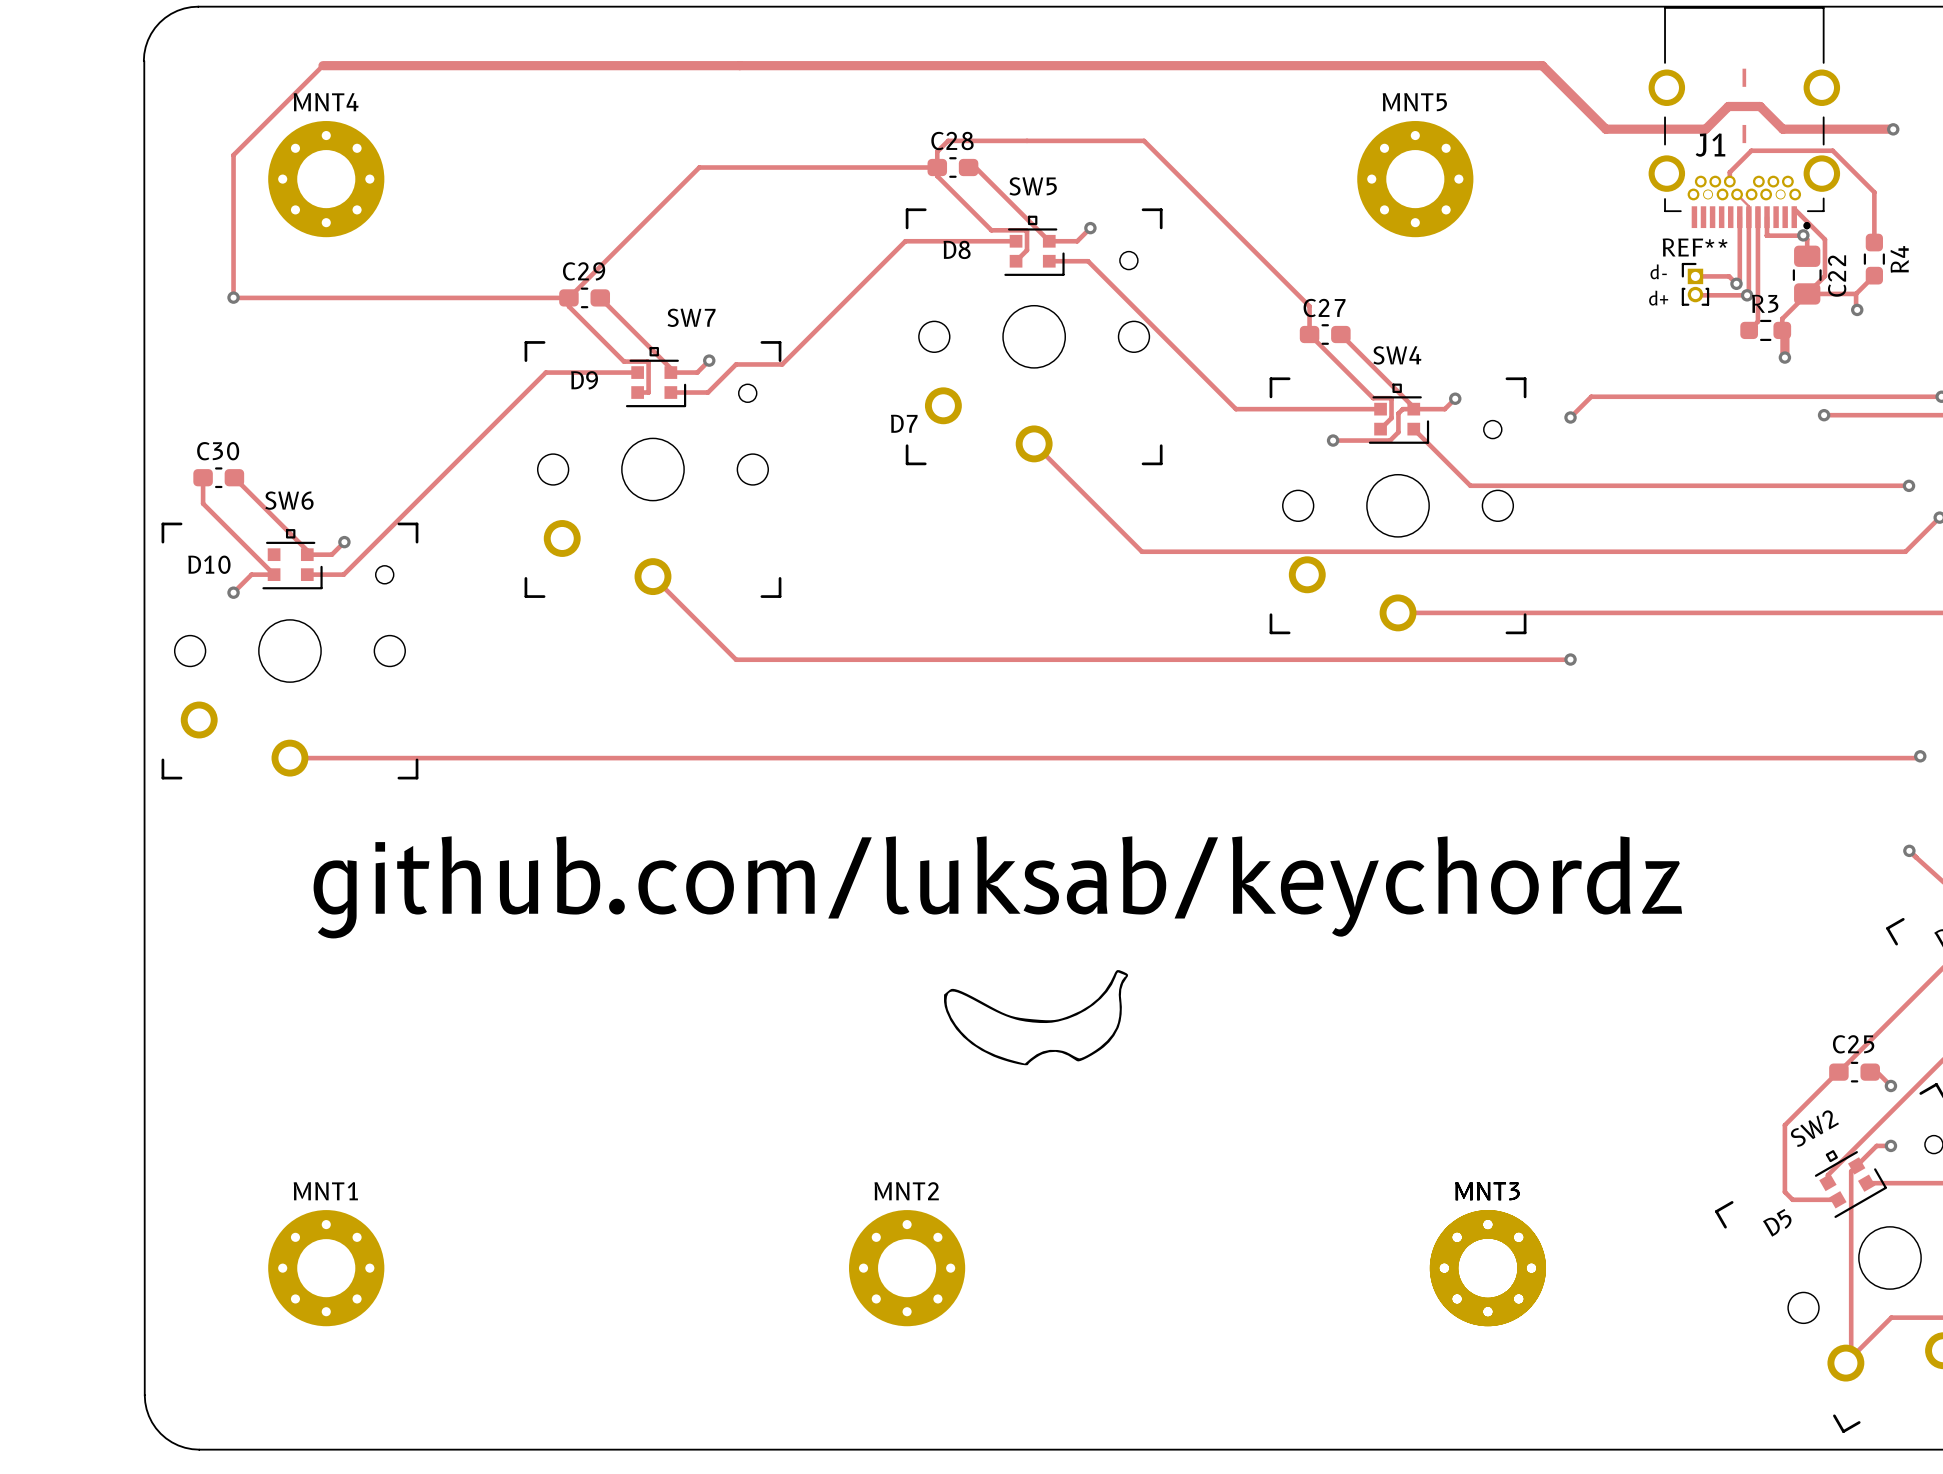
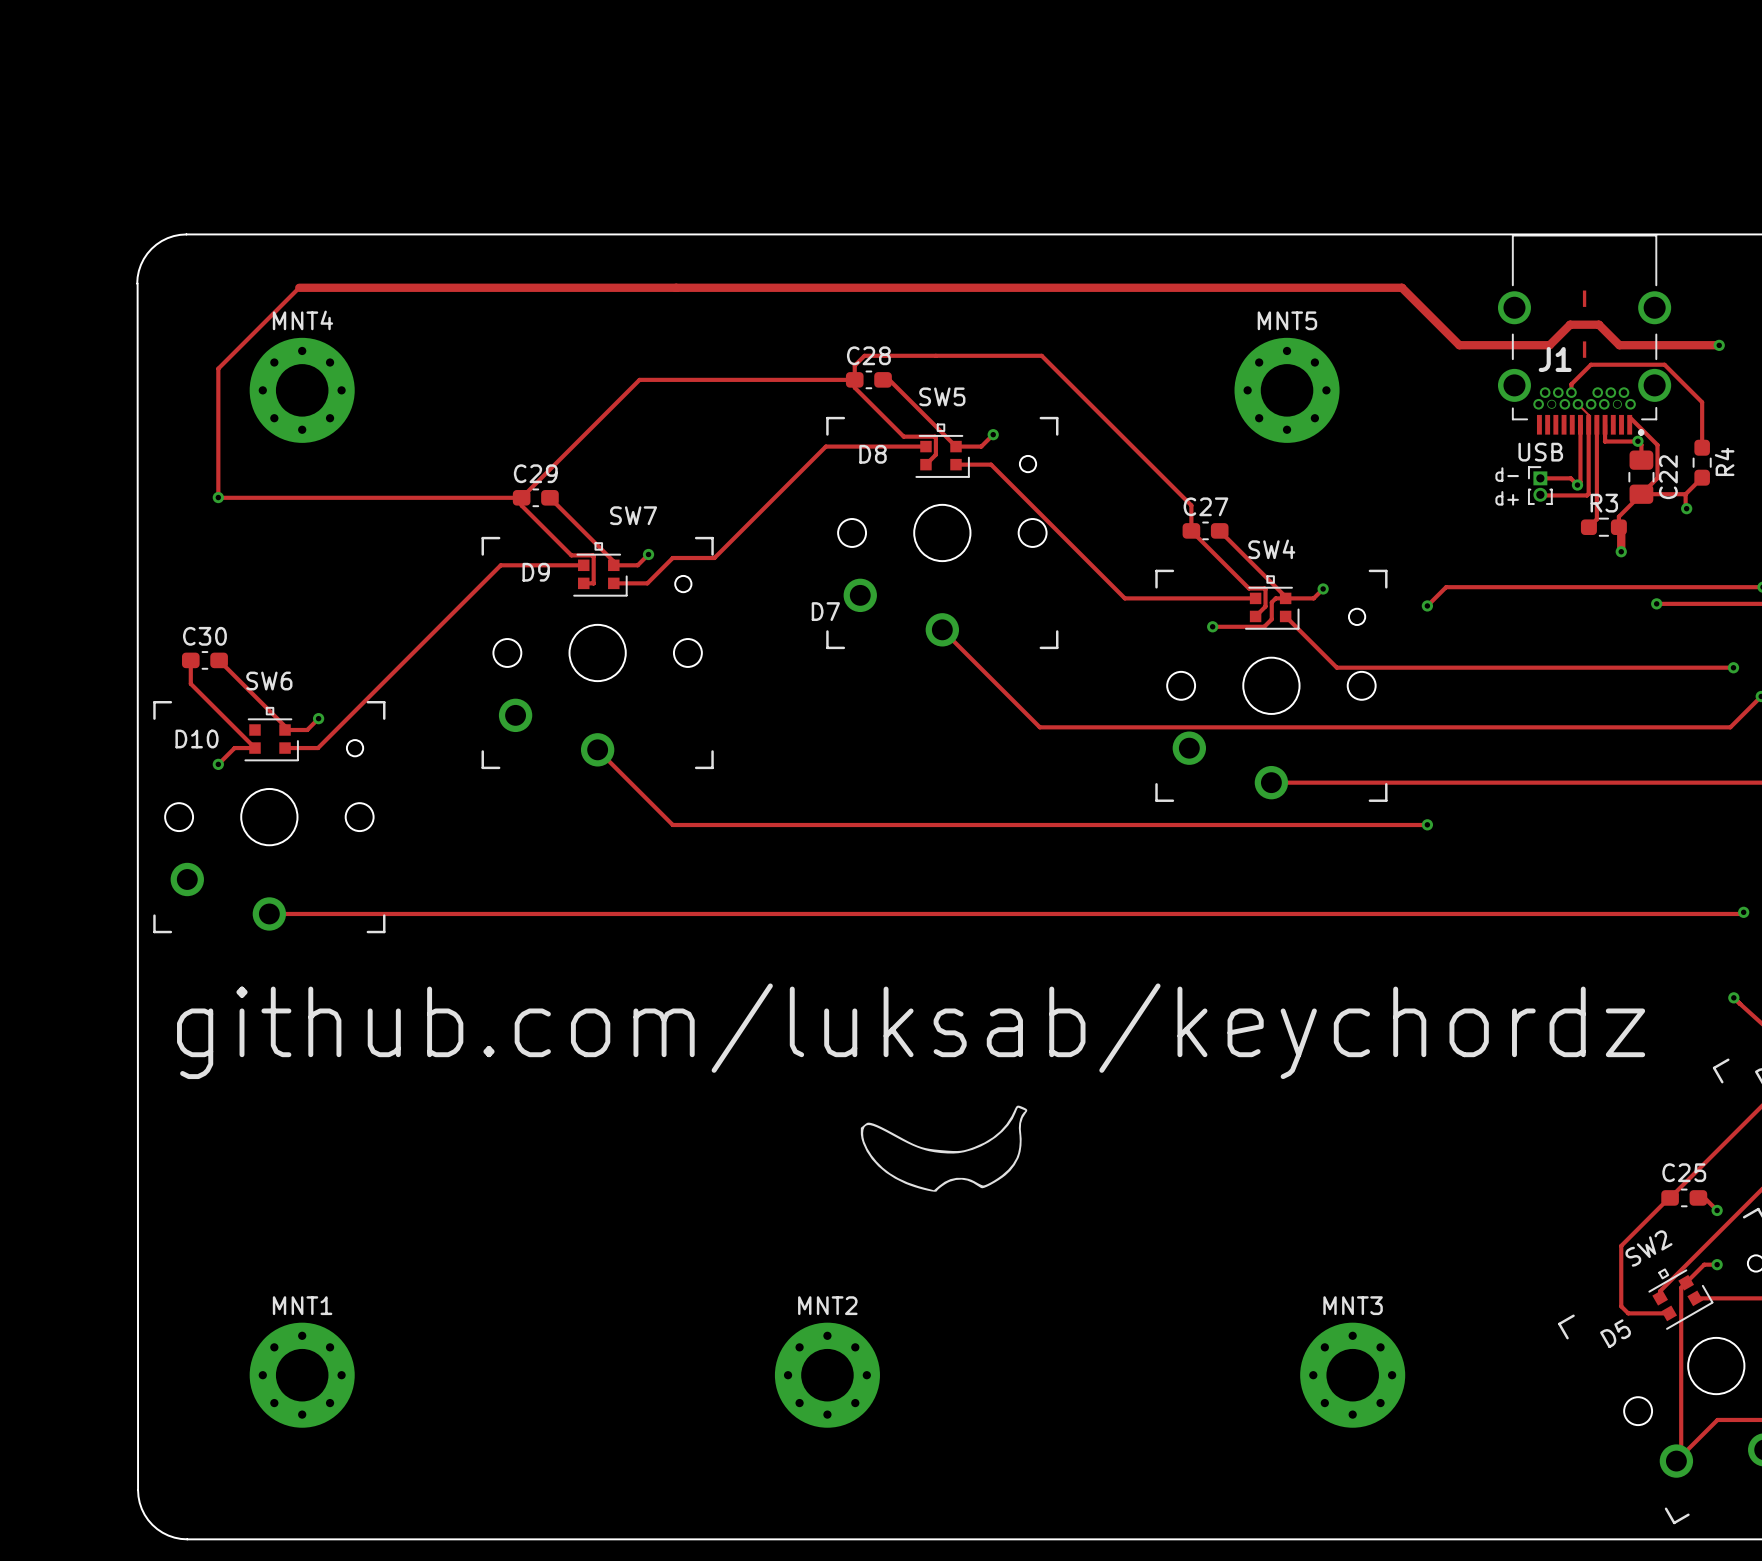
REF** name: REF** (1695, 247) -> USB (1540, 452)
via: (1747, 295) -> none
MNT3: (1487, 1268) -> none

